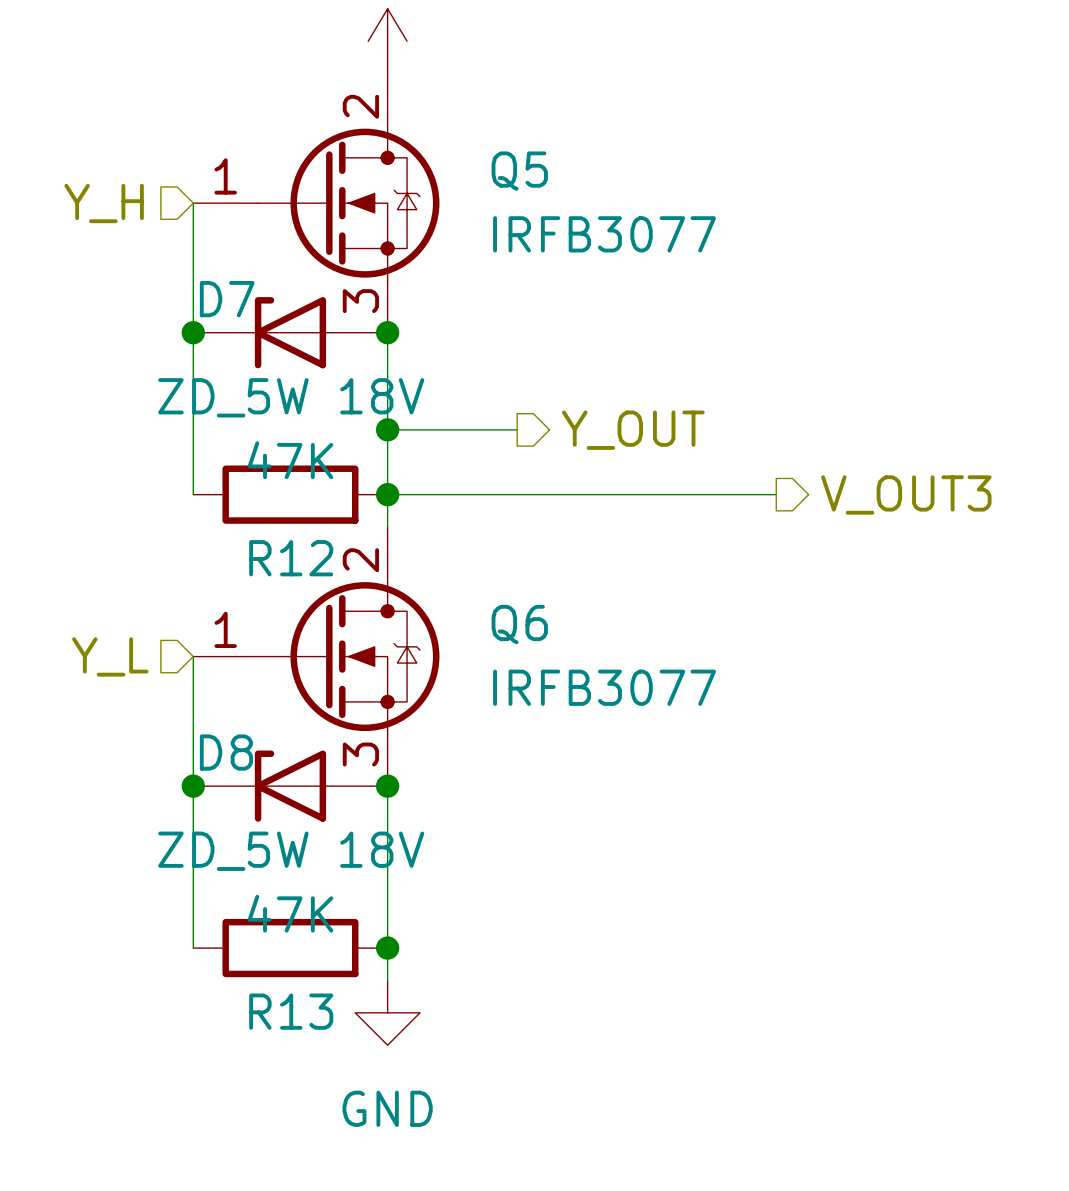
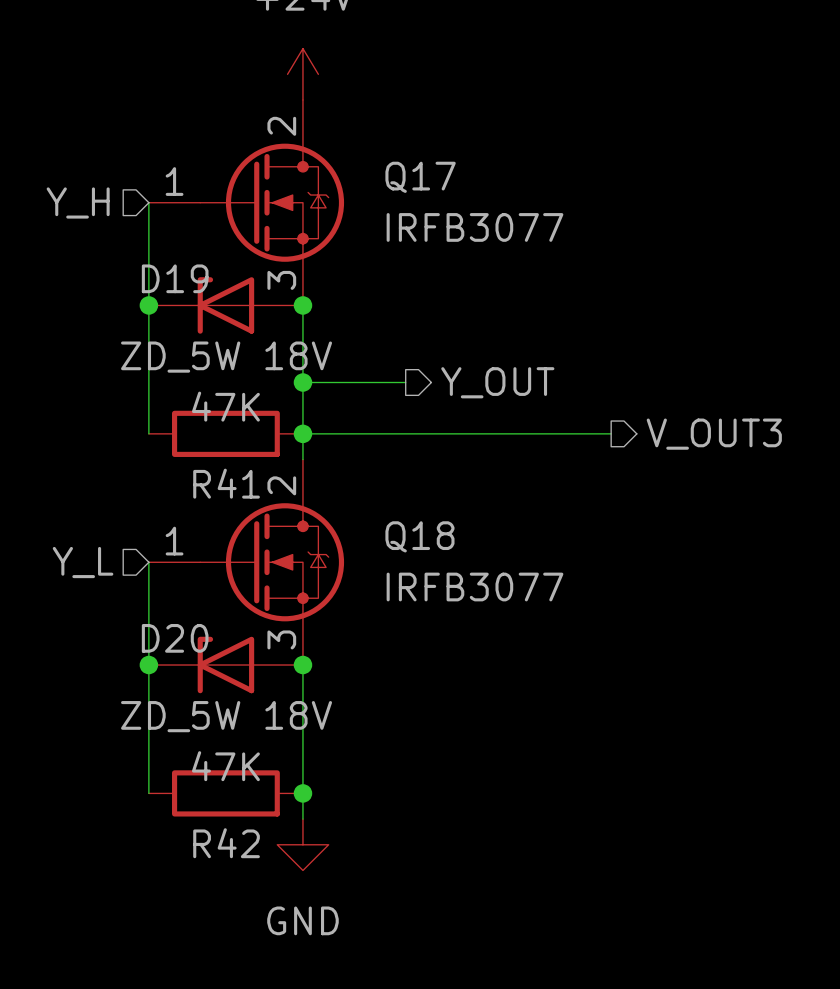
Q5 name: Q5 (519, 171) -> Q17 (420, 177)
D7 name: D7 (227, 299) -> D19 (175, 278)
R12 name: R12 (291, 558) -> R41 (226, 483)
Q6 name: Q6 (519, 624) -> Q18 (419, 536)
D8 name: D8 (226, 752) -> D20 (175, 638)
R13 name: R13 (291, 1011) -> R42 (226, 843)

